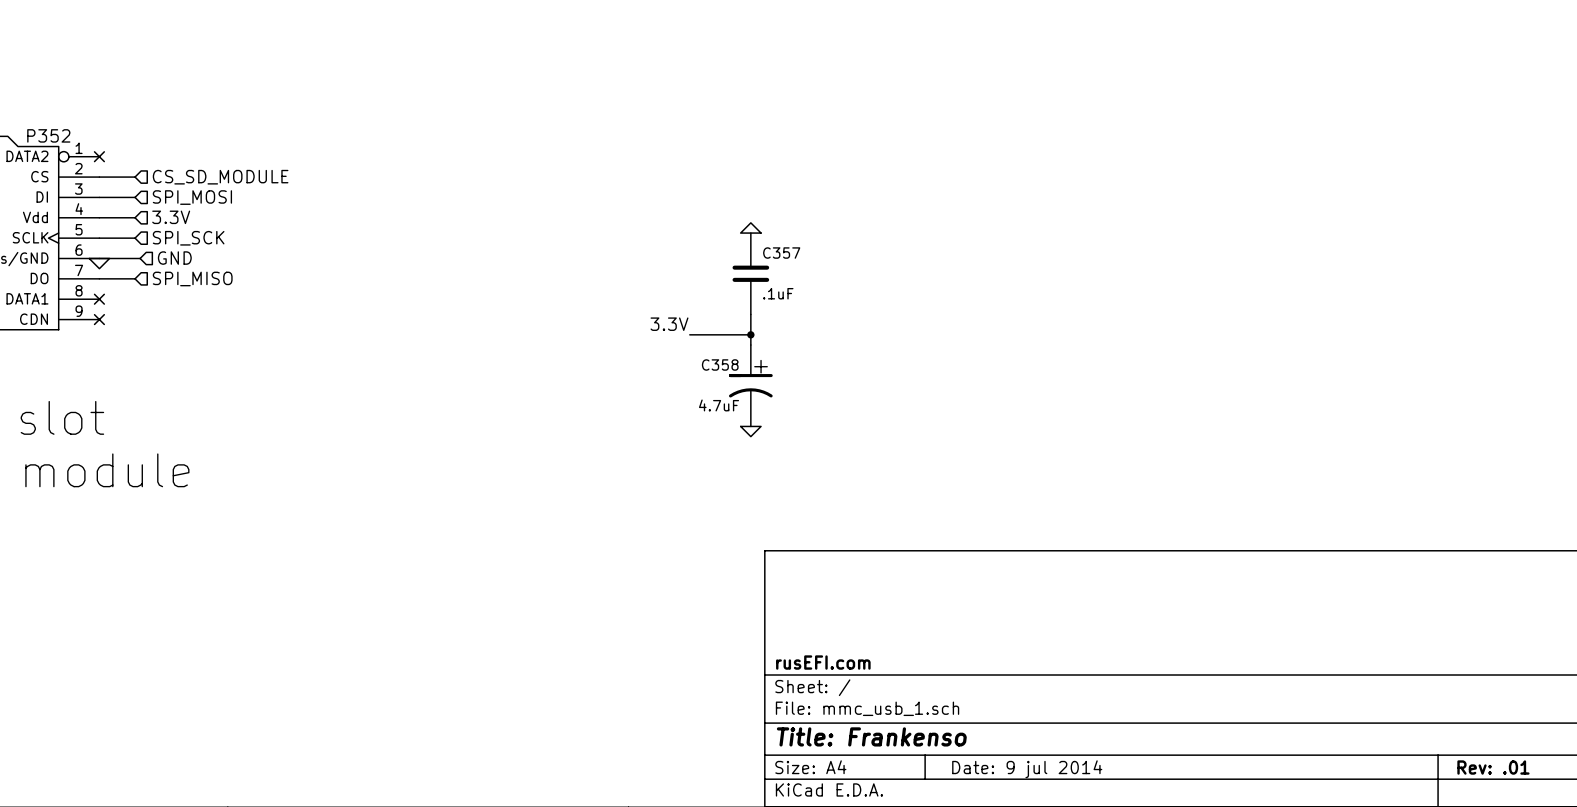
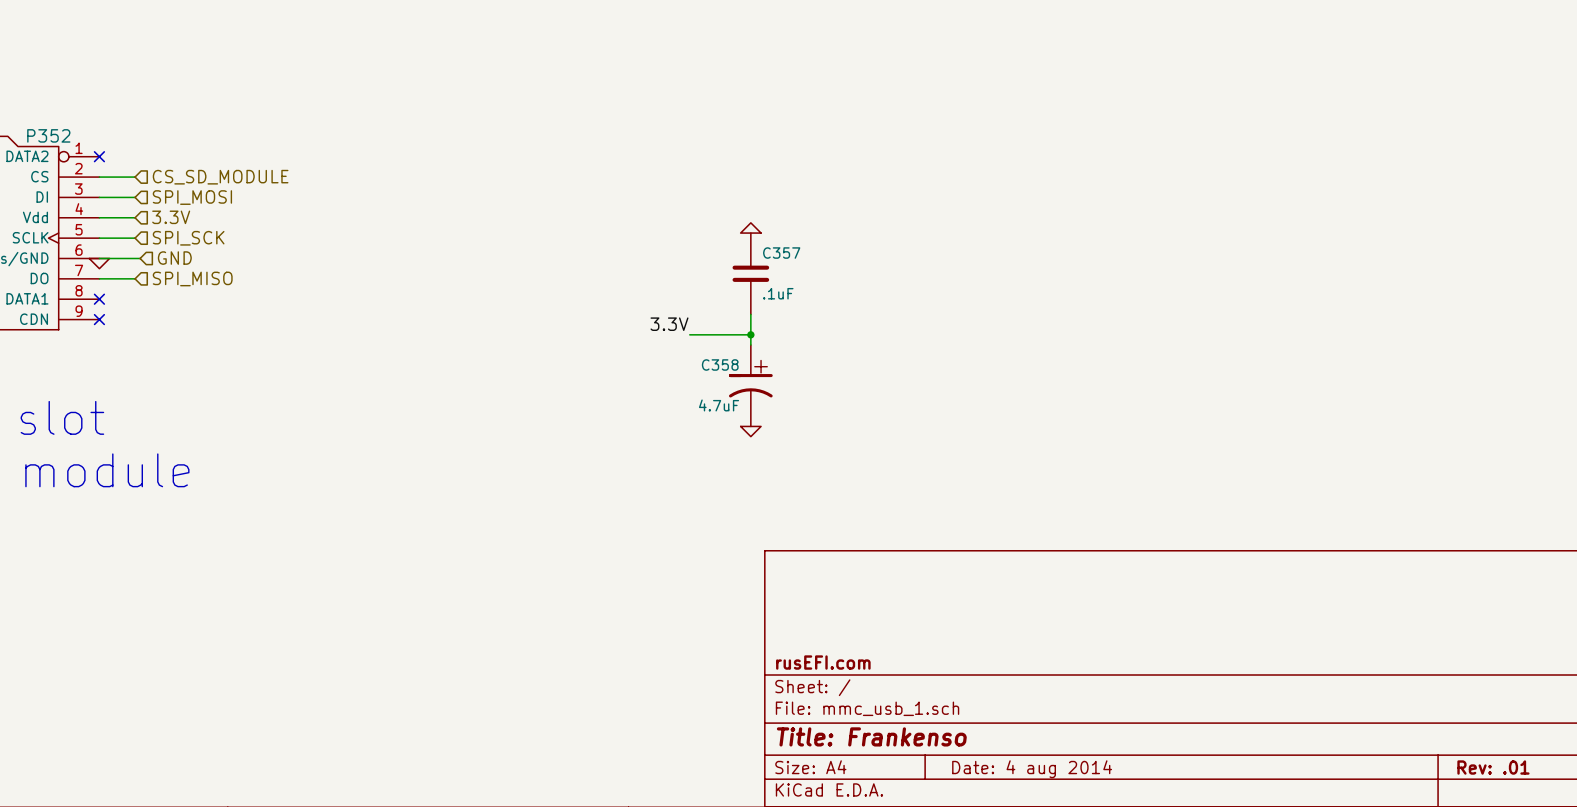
title block: Date: 9 jul 2014 (1027, 769) -> Date: 4 aug 2014 (1032, 769)

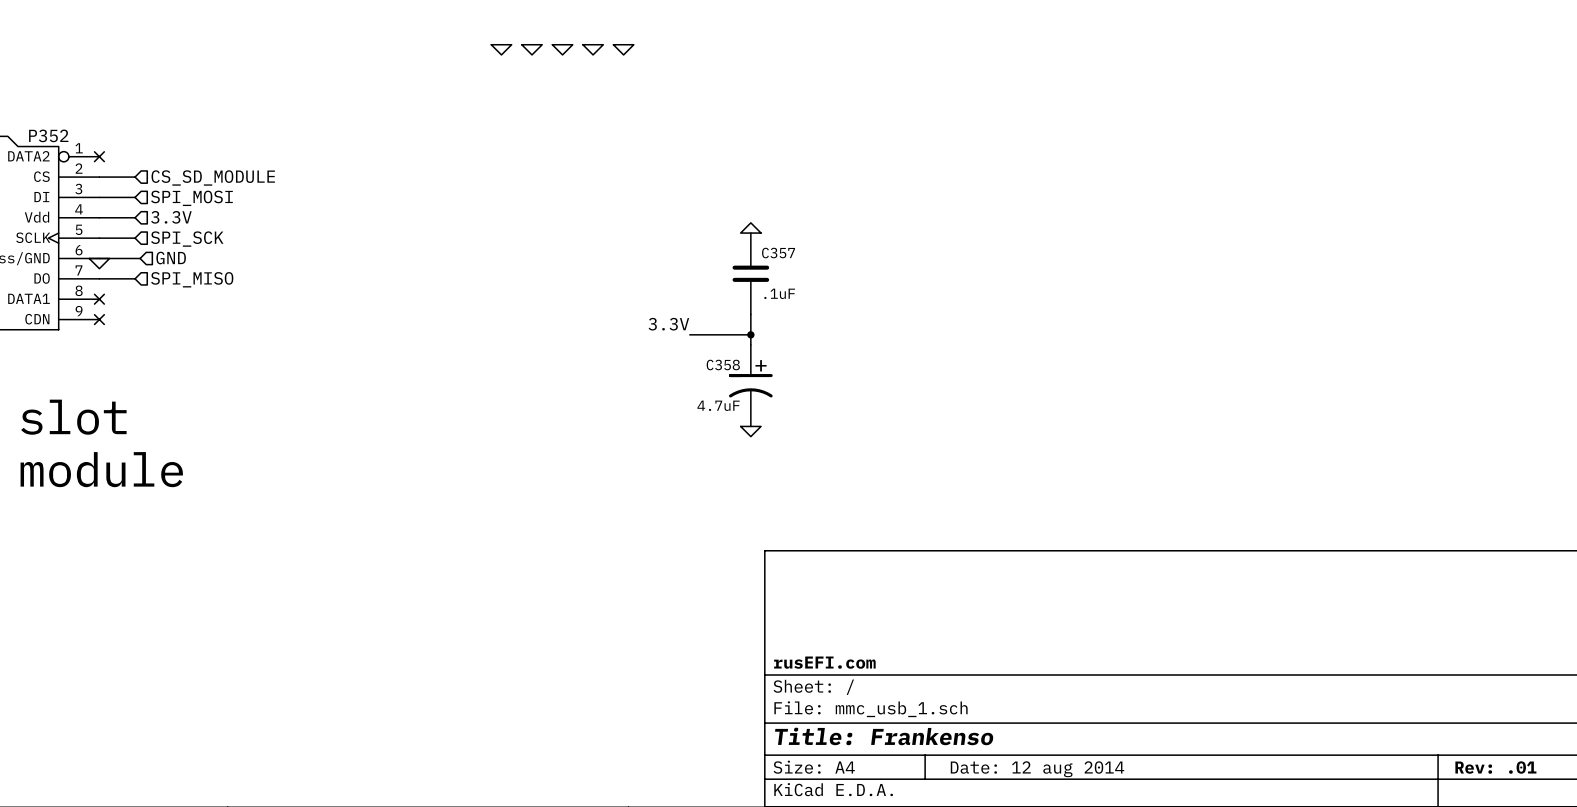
power symbol: none -> (501, 49)
power symbol: none -> (532, 49)
power symbol: none -> (562, 49)
power symbol: none -> (593, 49)
power symbol: none -> (623, 49)
title block: Date: 4 aug 2014 (1032, 769) -> Date: 12 aug 2014 (1037, 769)

